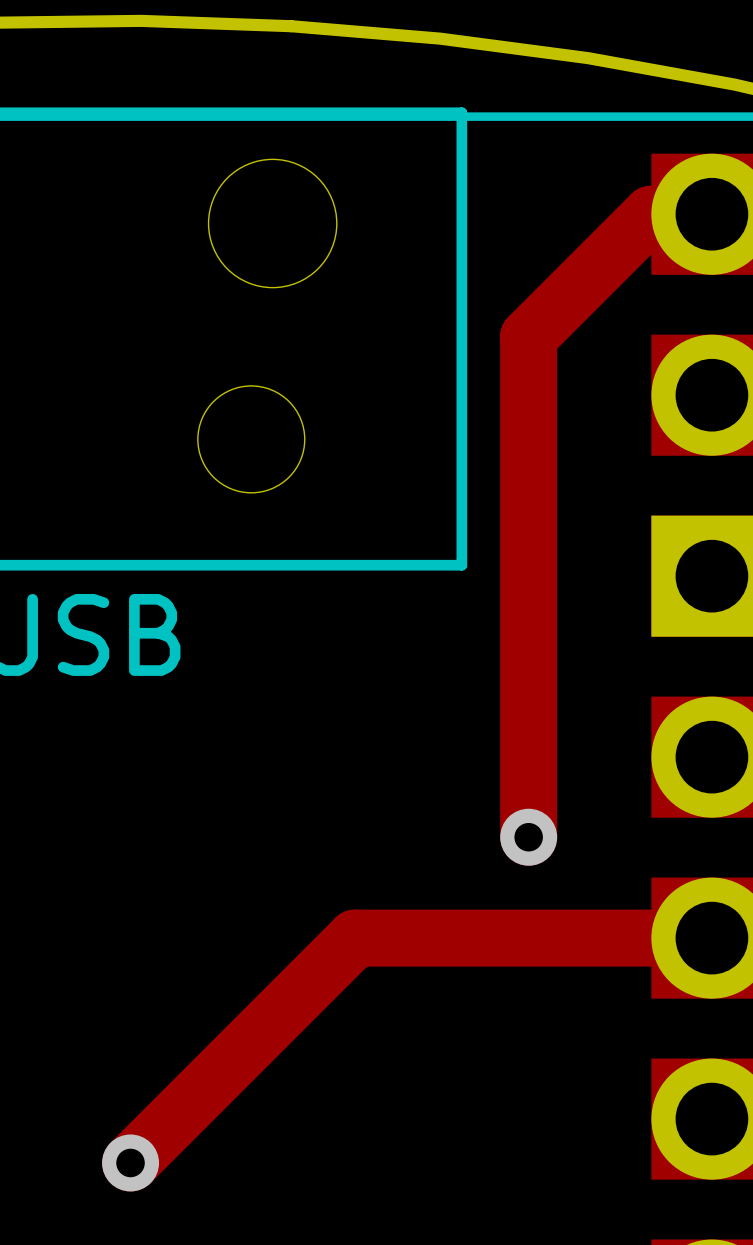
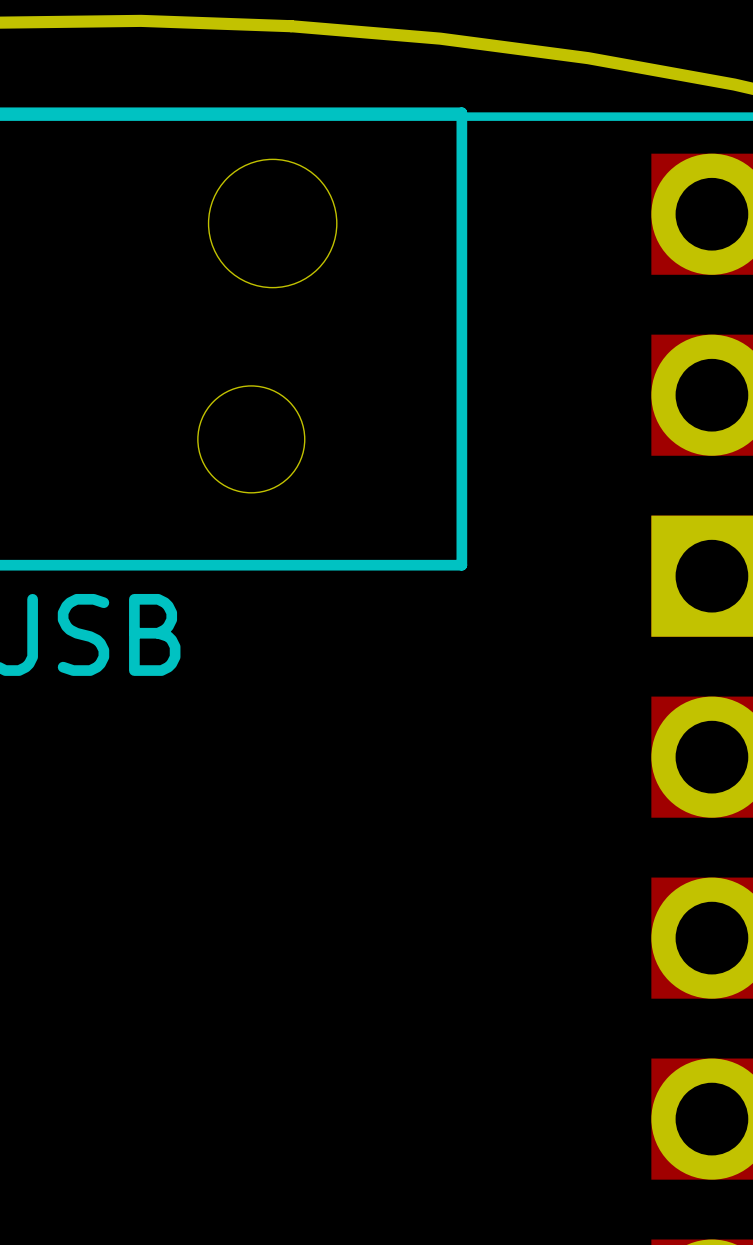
track: (711, 214) (651, 214) (528, 336) (528, 837) -> none
via: (528, 837) -> none
track: (711, 938) (355, 938) (130, 1162) -> none
via: (130, 1162) -> none

